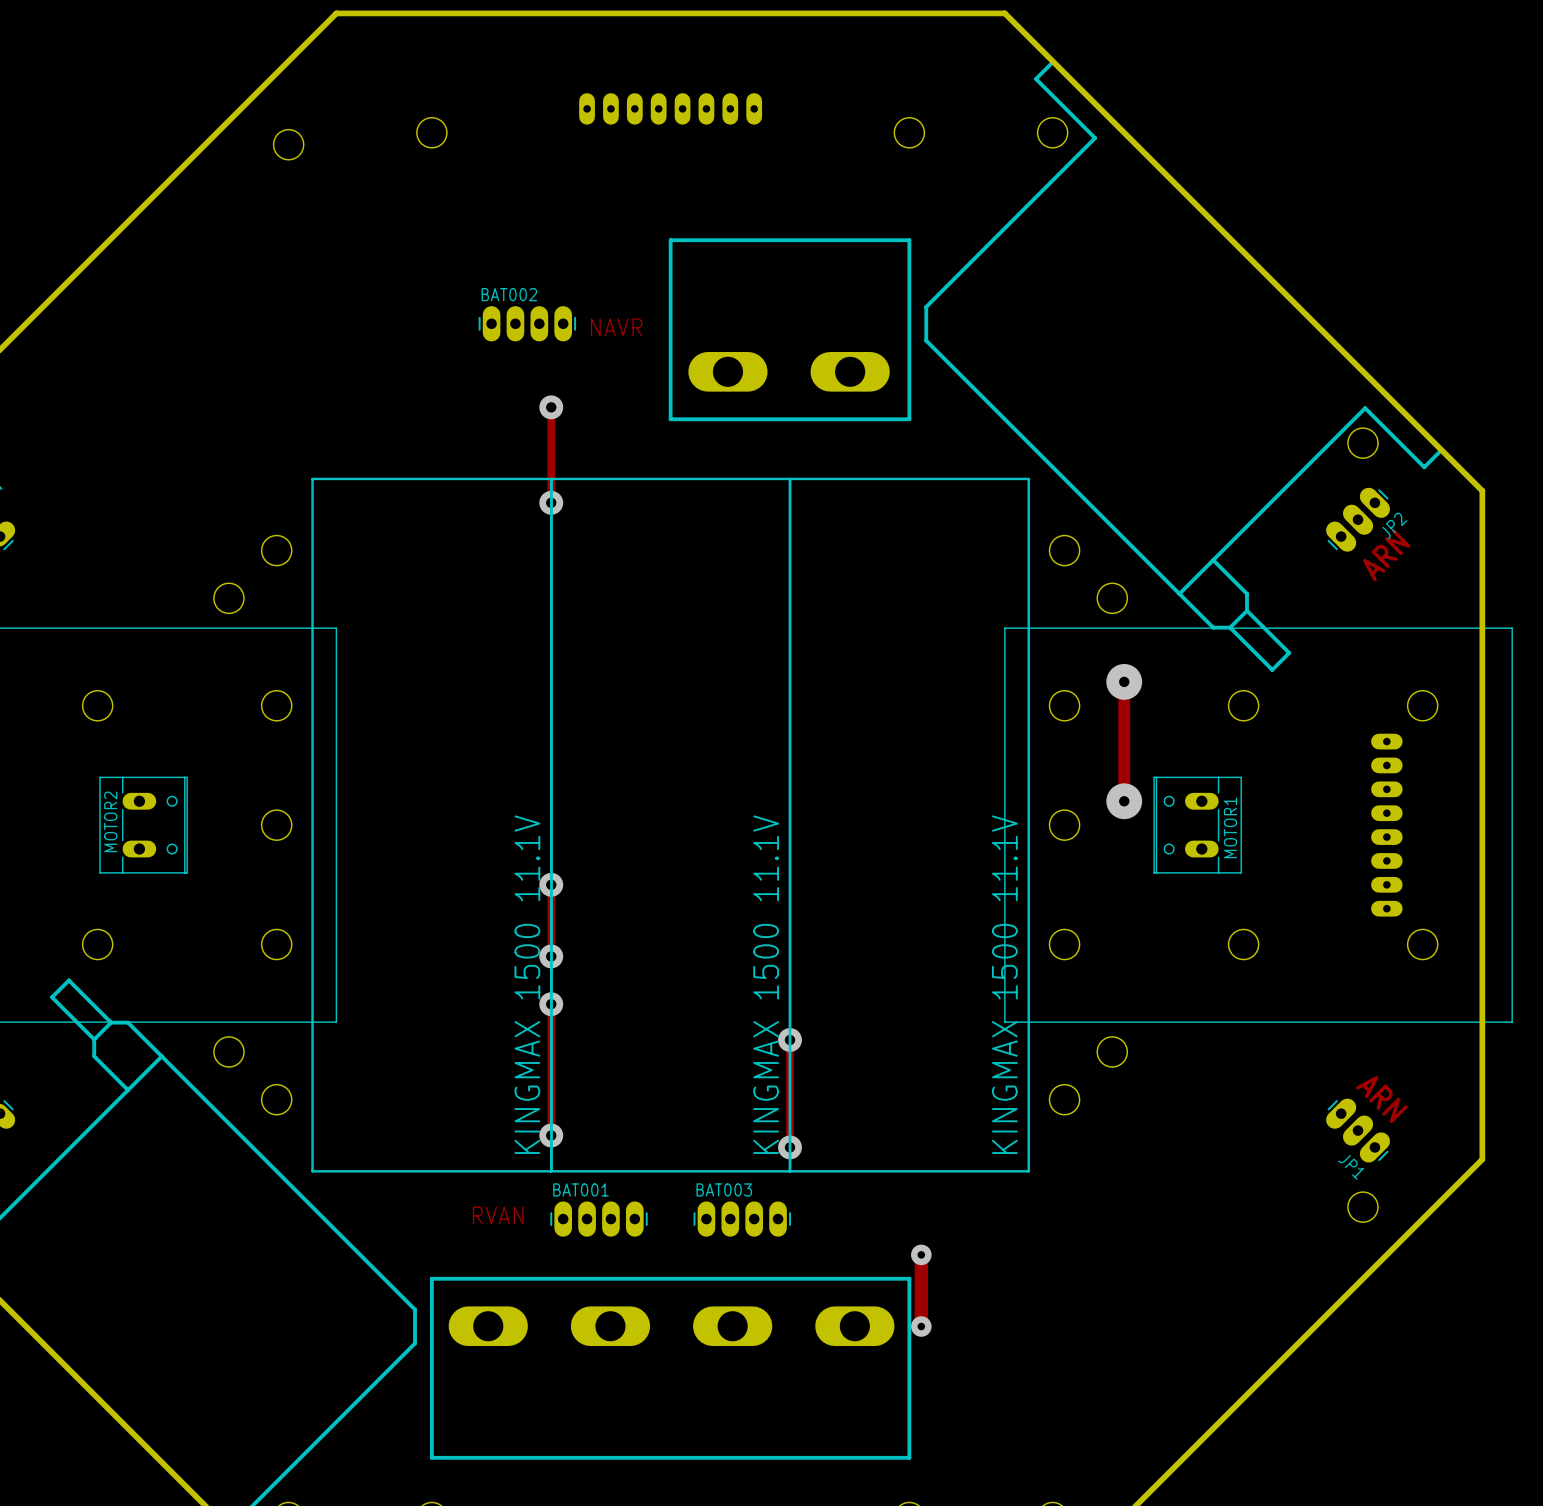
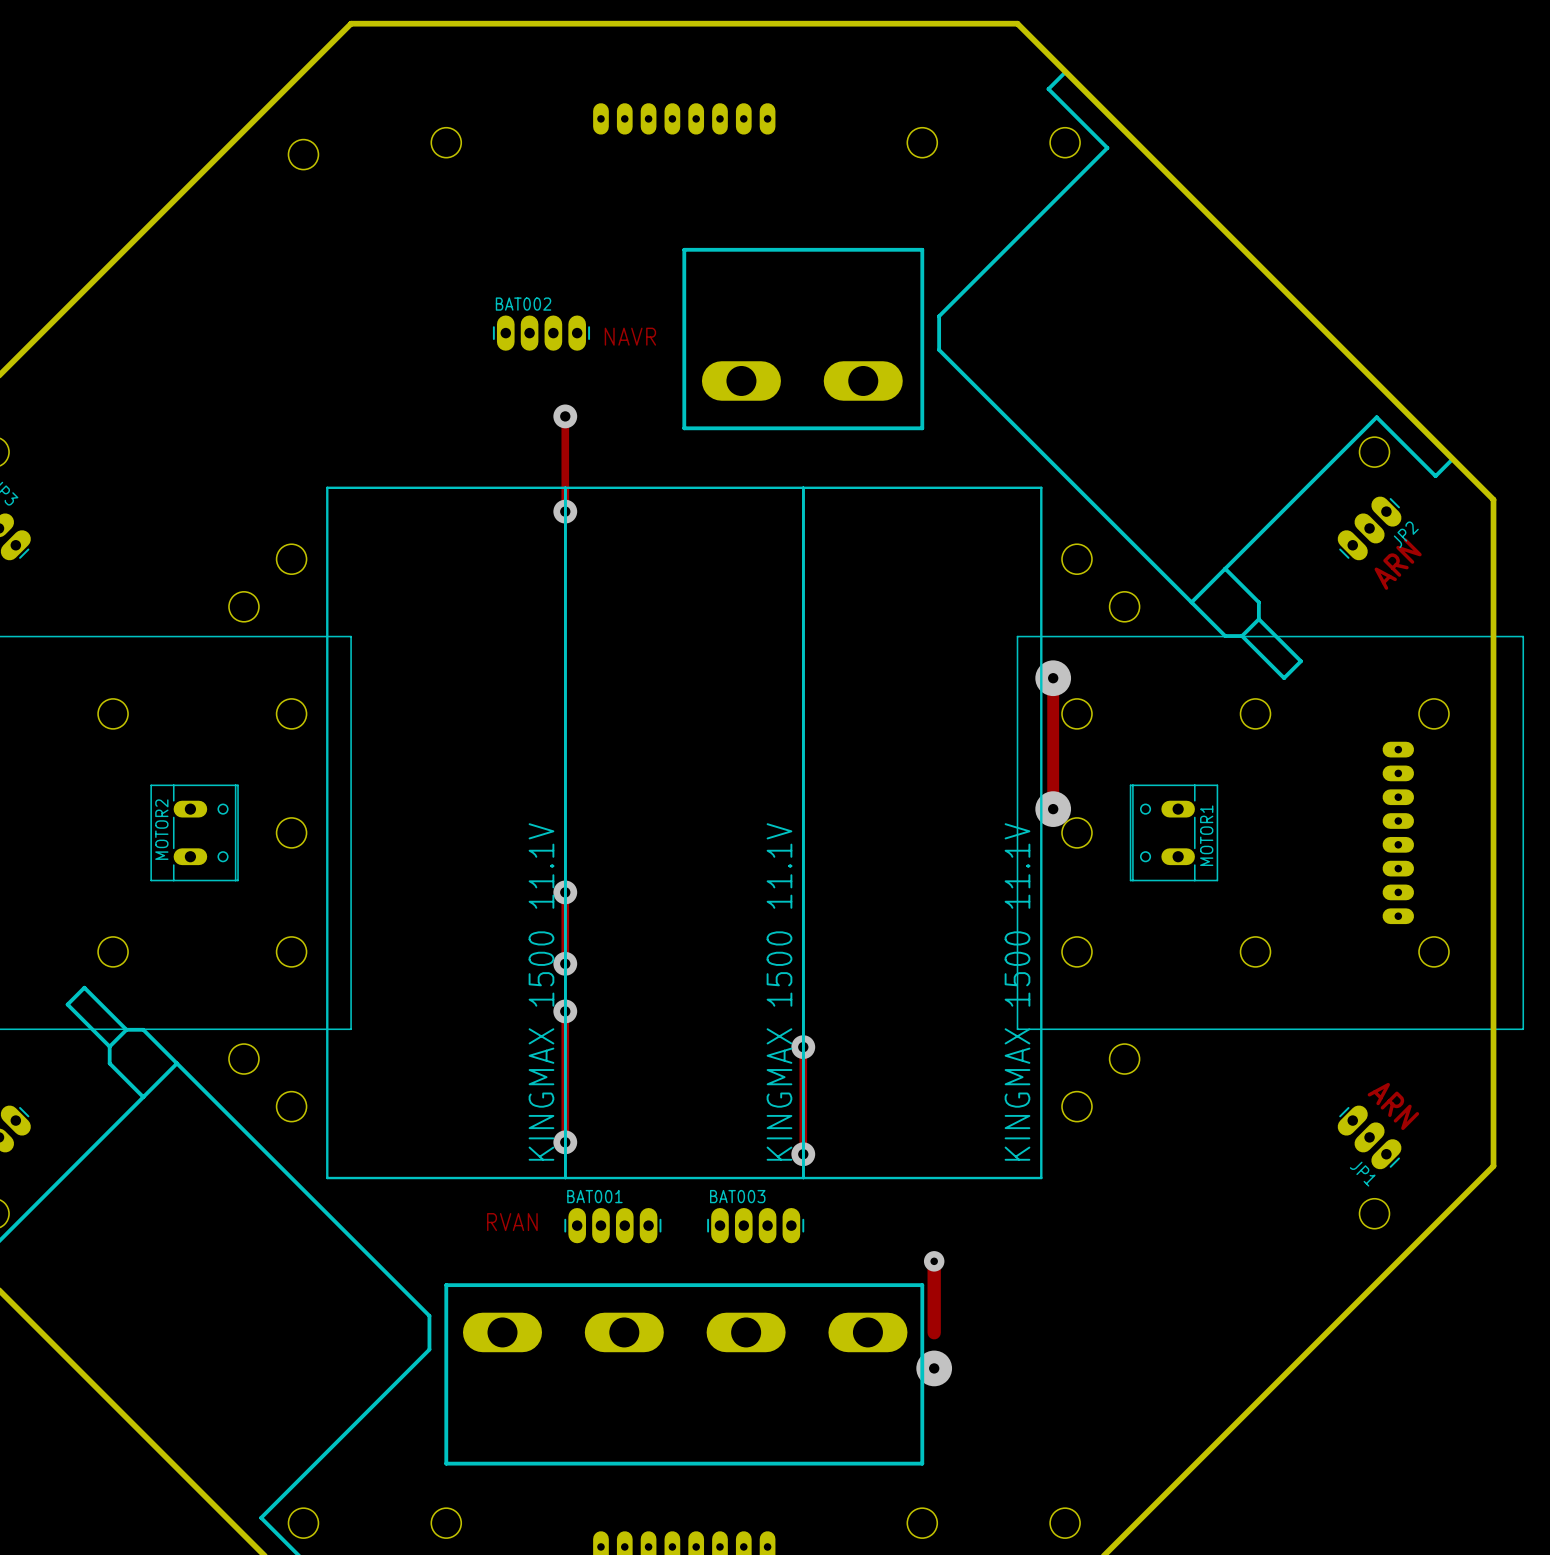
track: none -> (1053, 678) (1053, 809)
via: none -> (1053, 678)
track: (1124, 681) (1124, 801) -> none
via: (1124, 681) -> none
via: none -> (1053, 809)
via: (1124, 801) -> none
MOTOR2 position: (143, 825) -> (194, 832)
MOTOR1 position: (1197, 825) -> (1173, 832)
via: (921, 1326) -> none
via: none -> (934, 1368)

